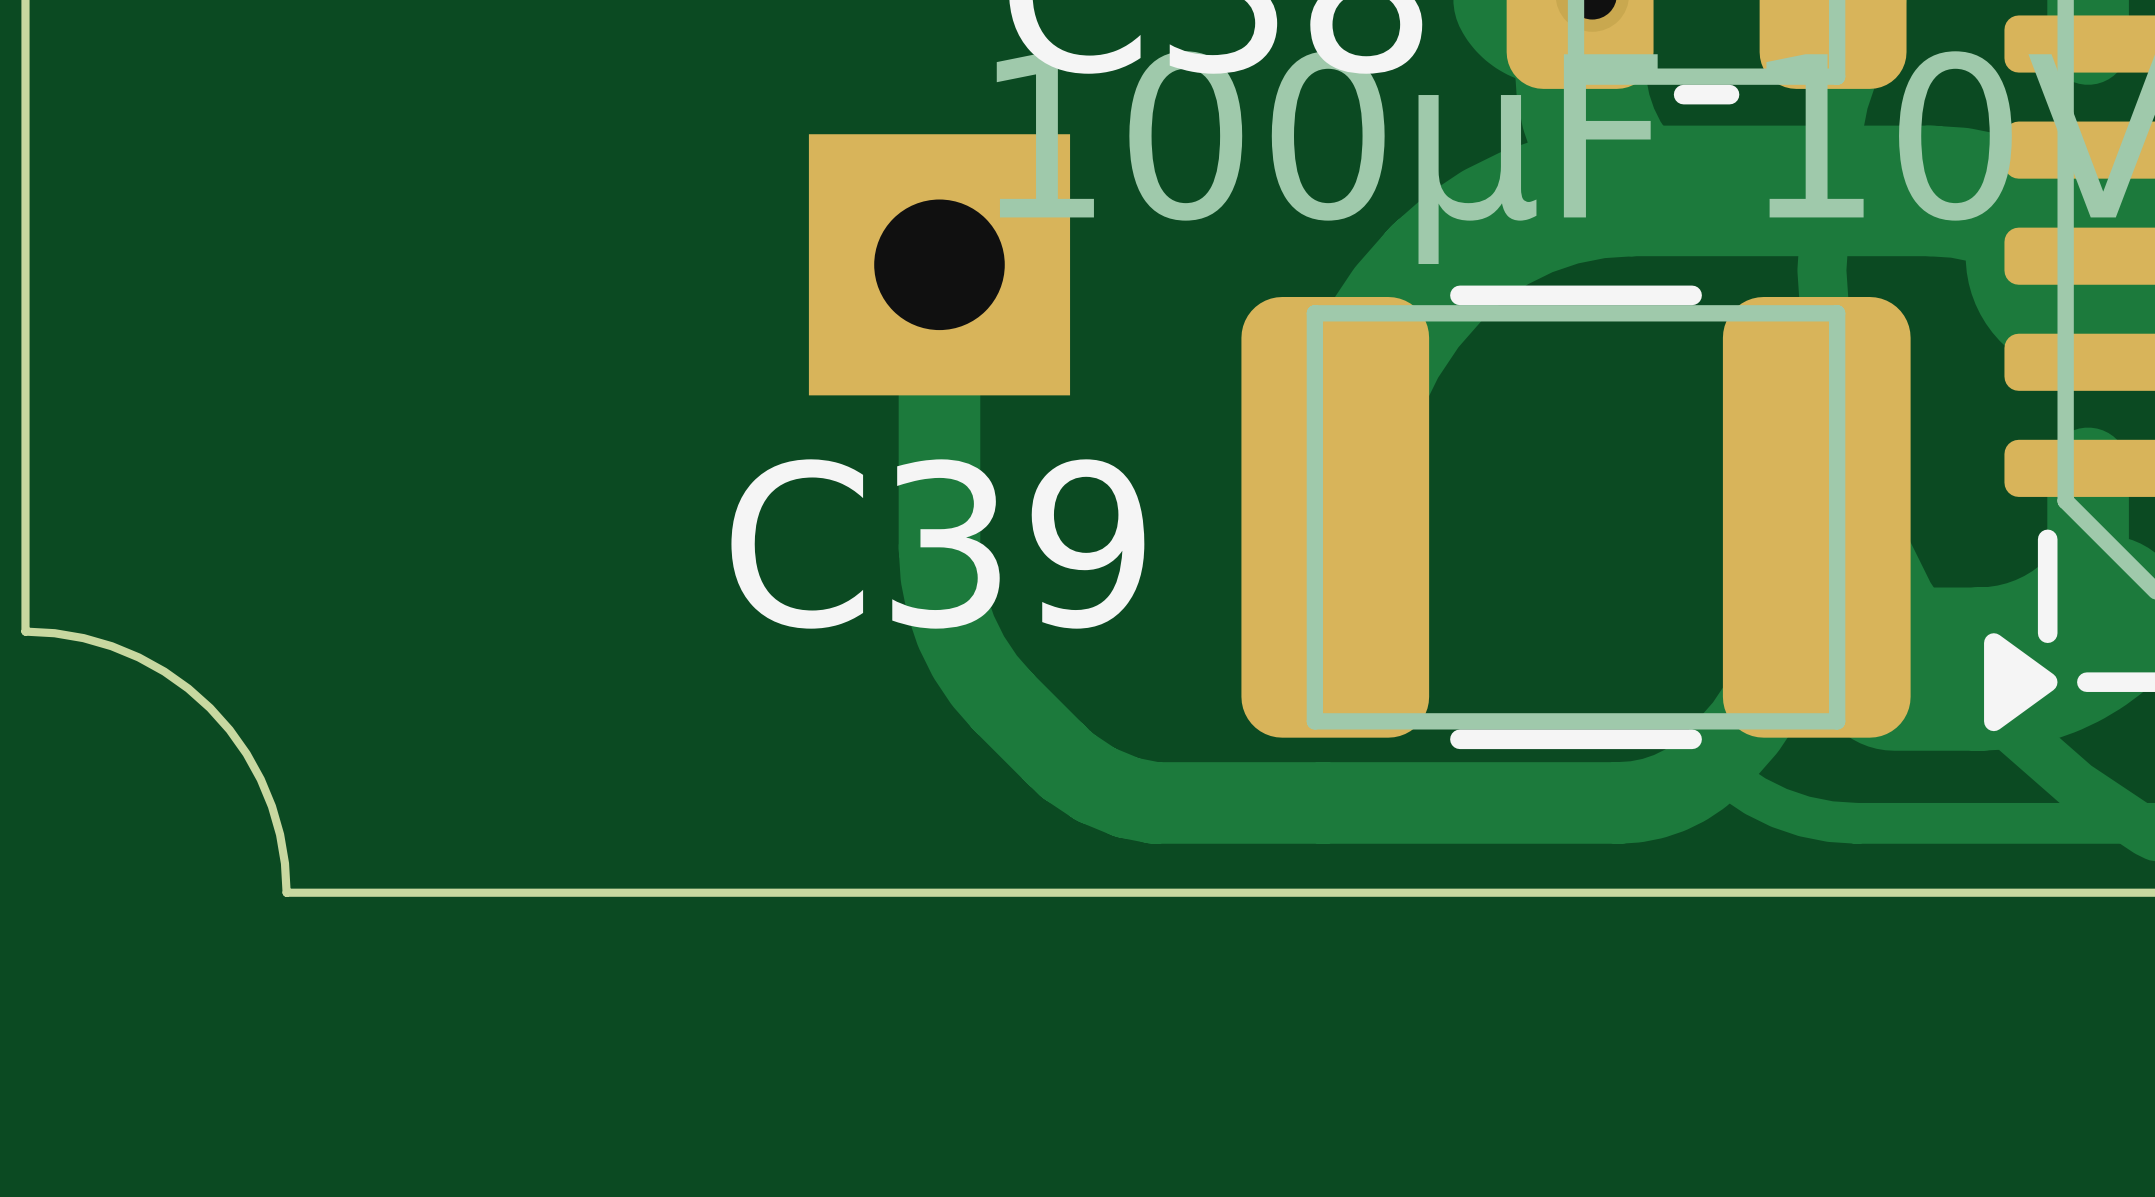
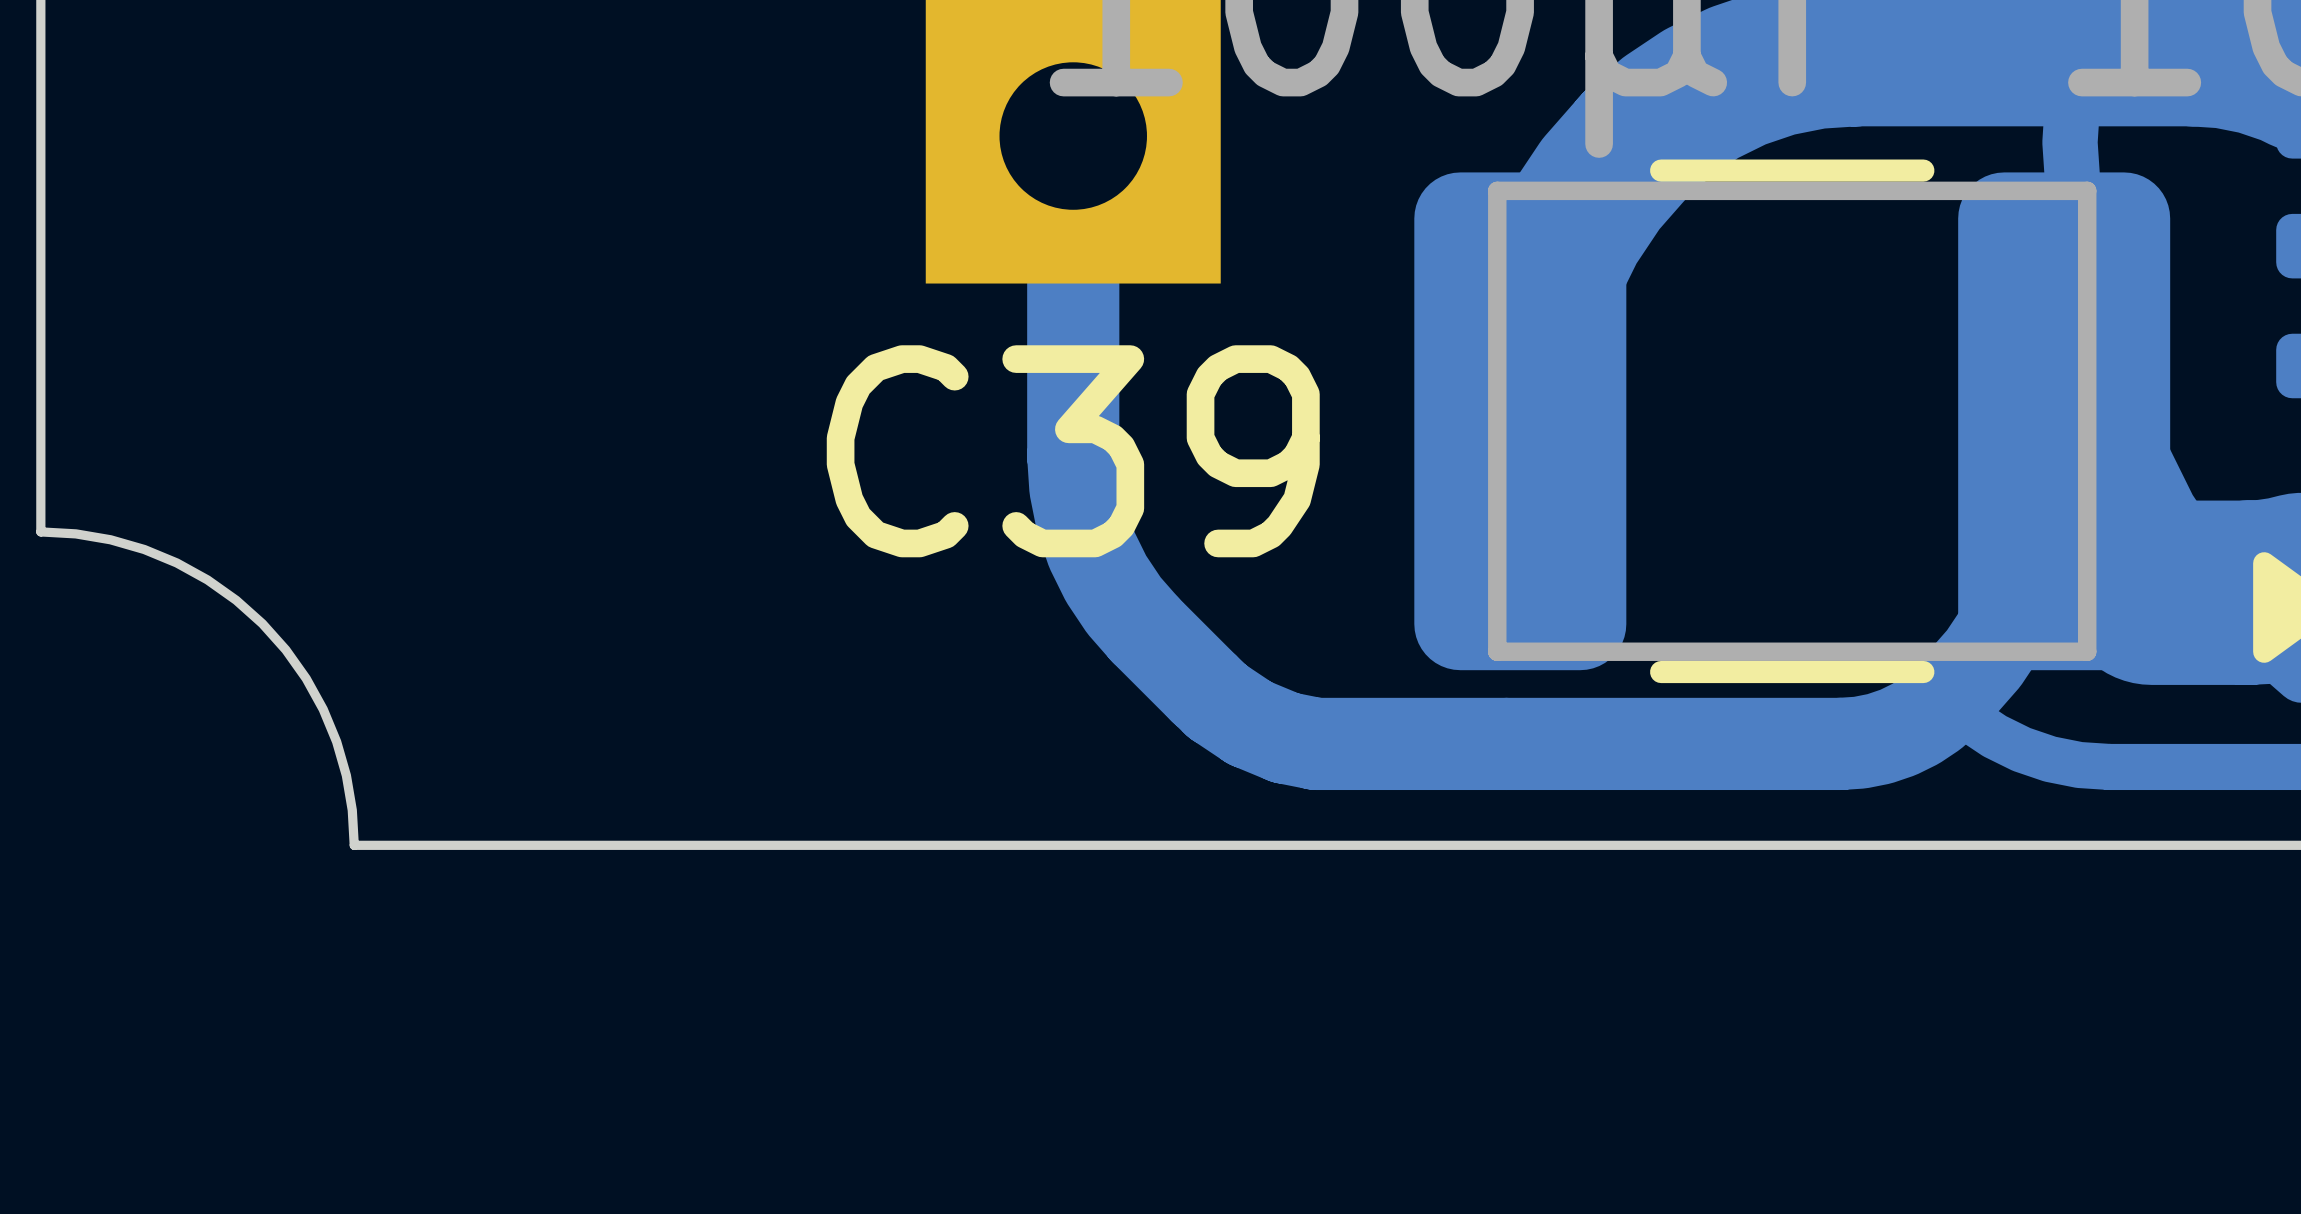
board edge: (25, 615) (25, 631) (54, 633) (83, 638) (111, 646) (138, 657) (164, 671) (188, 688) (210, 708) (229, 729) (246, 753) (260, 779) (271, 806) (280, 834) (284, 863) (286, 892) (302, 892) -> (40, 531) (75, 533) (110, 539) (144, 549) (176, 562) (207, 579) (236, 600) (262, 623) (285, 649) (306, 678) (323, 709) (336, 741) (346, 775) (352, 810) (354, 845)

